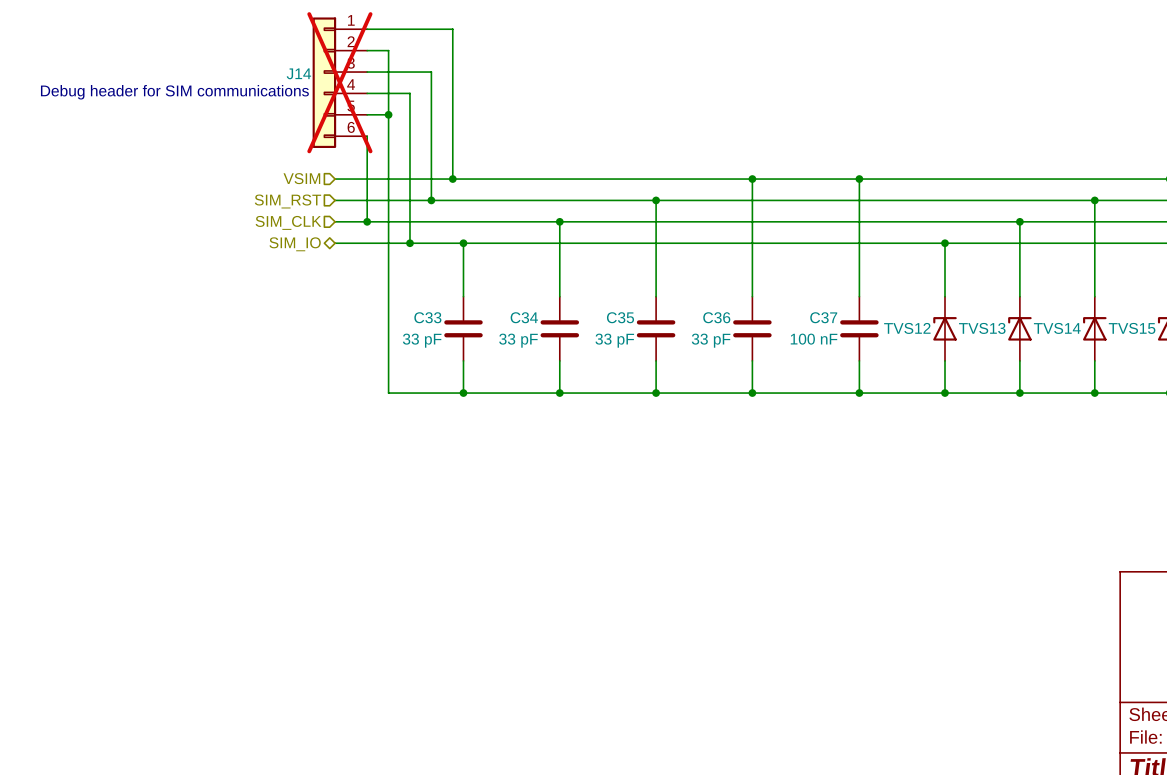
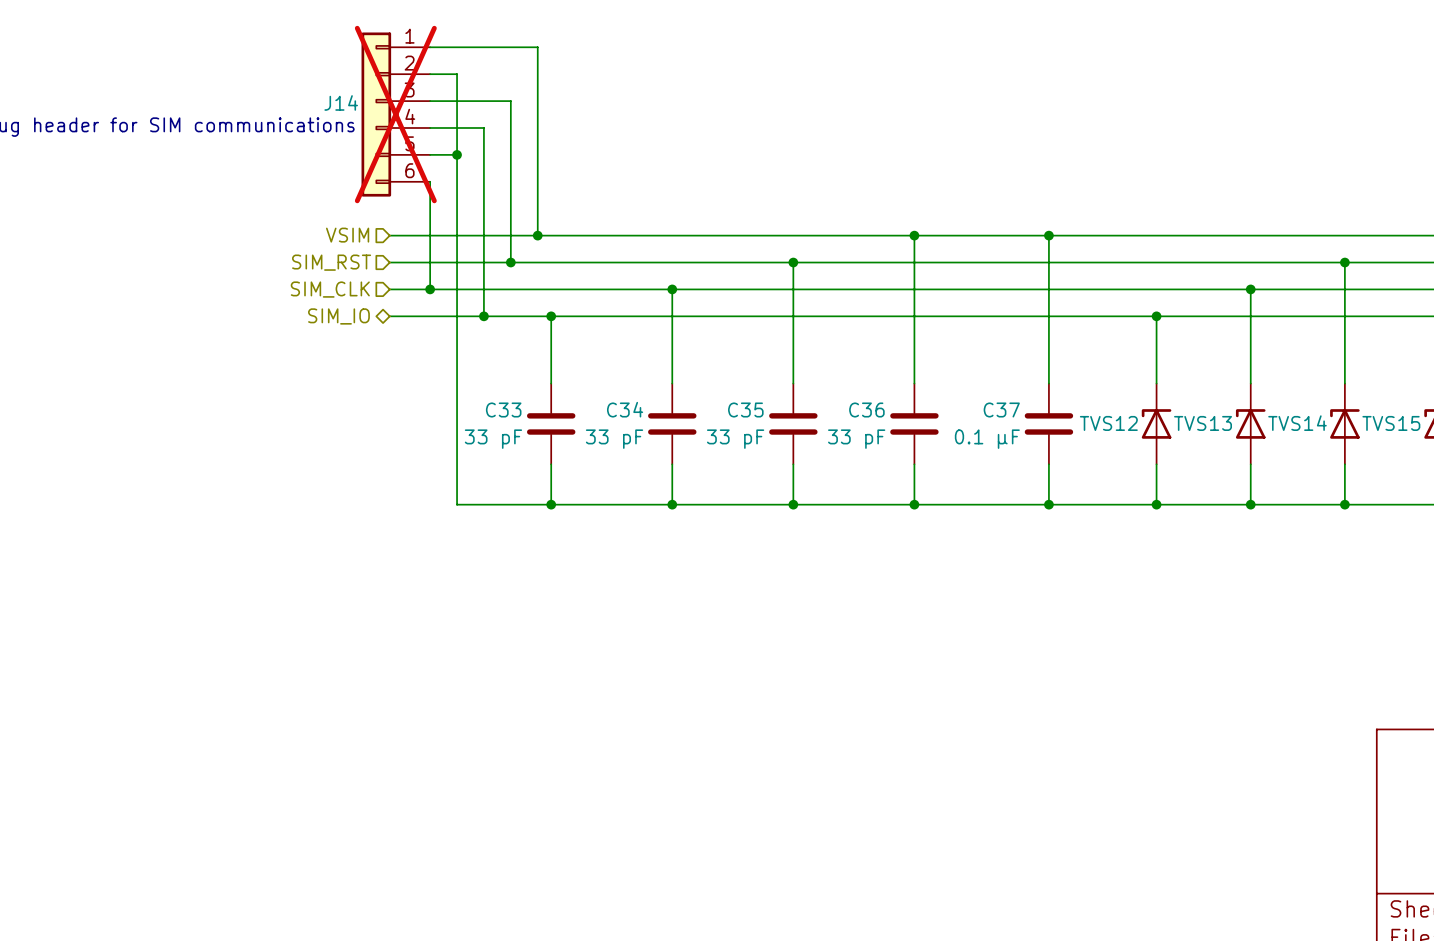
C37 value: 100 nF (814, 339) -> 0.1 µF (987, 439)

